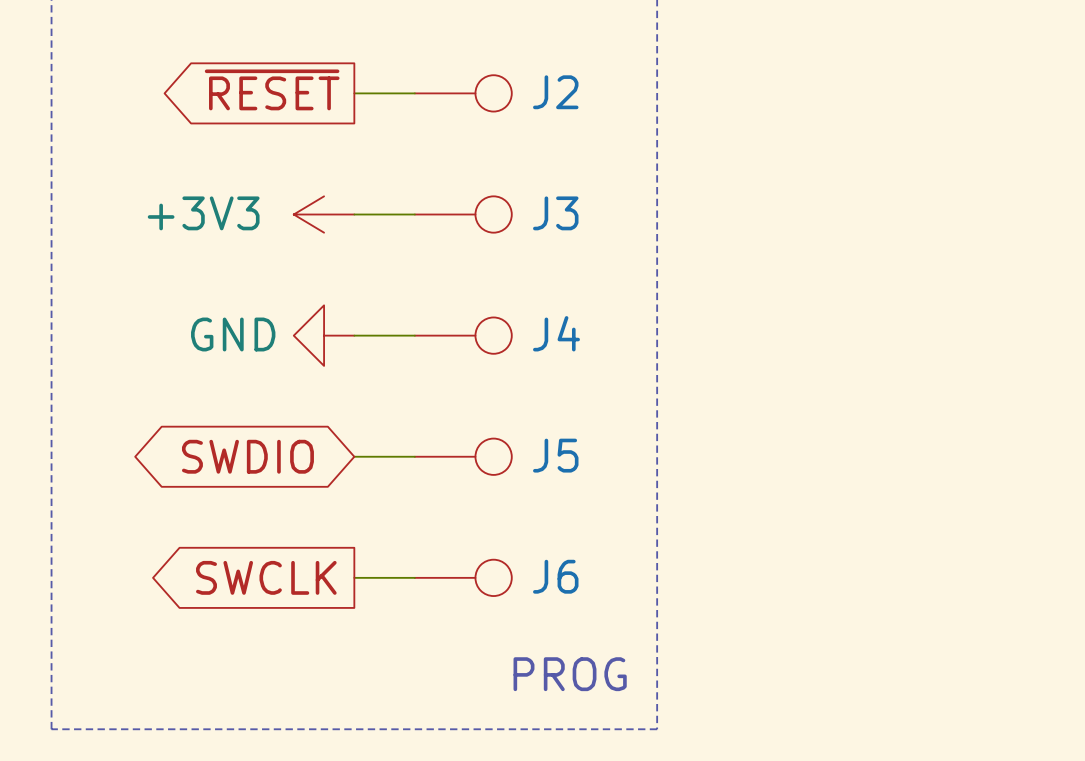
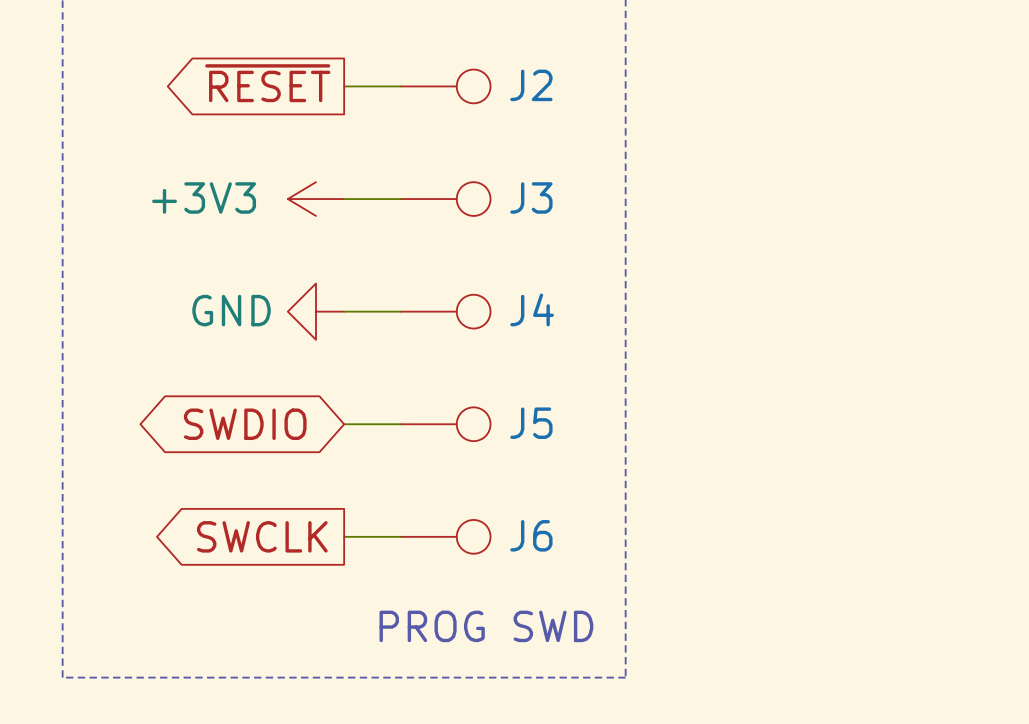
text: PROG (570, 674) -> PROG SWD (486, 626)

